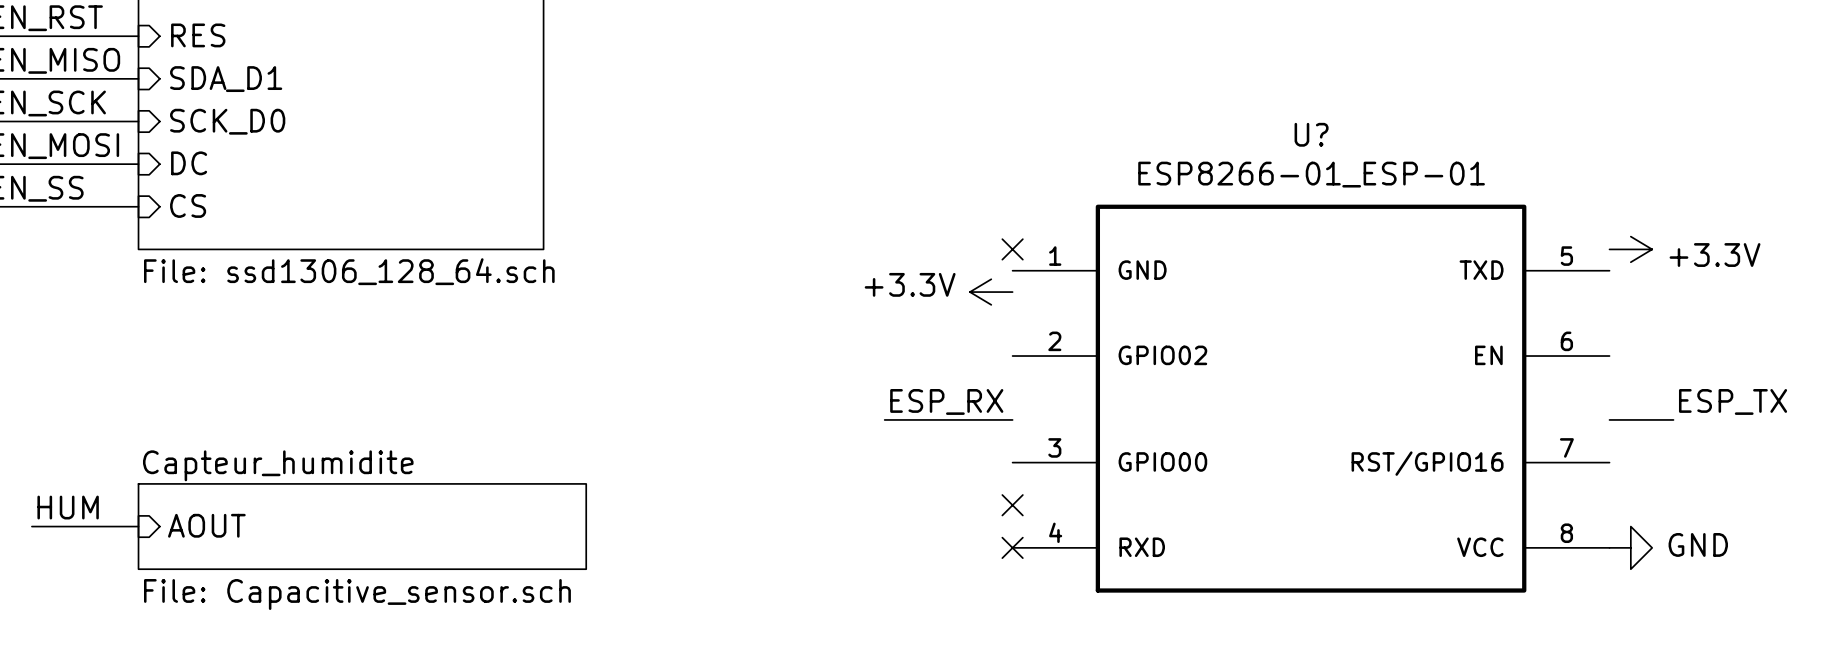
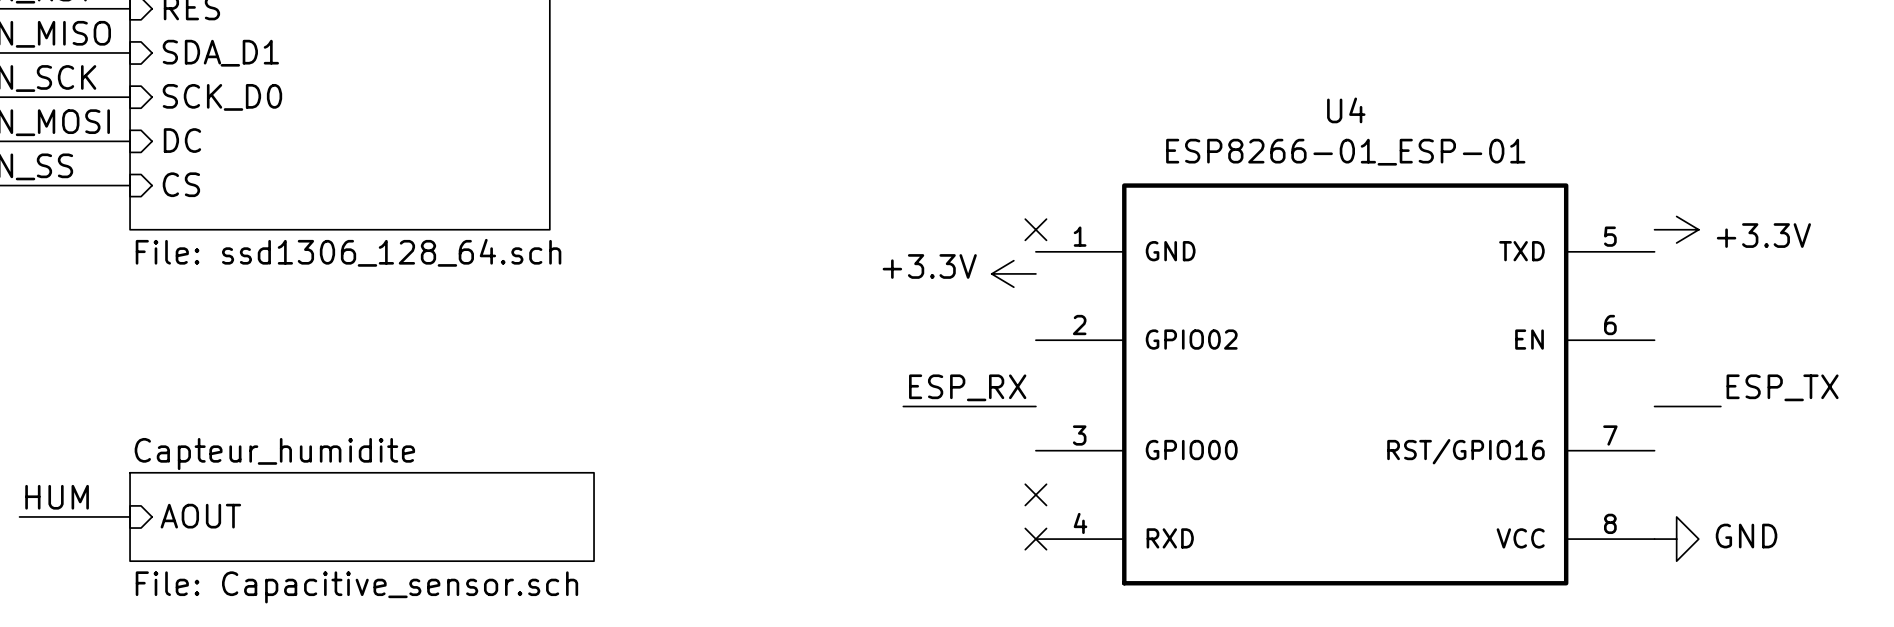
U? name: U? (1311, 134) -> U4 (1346, 110)

